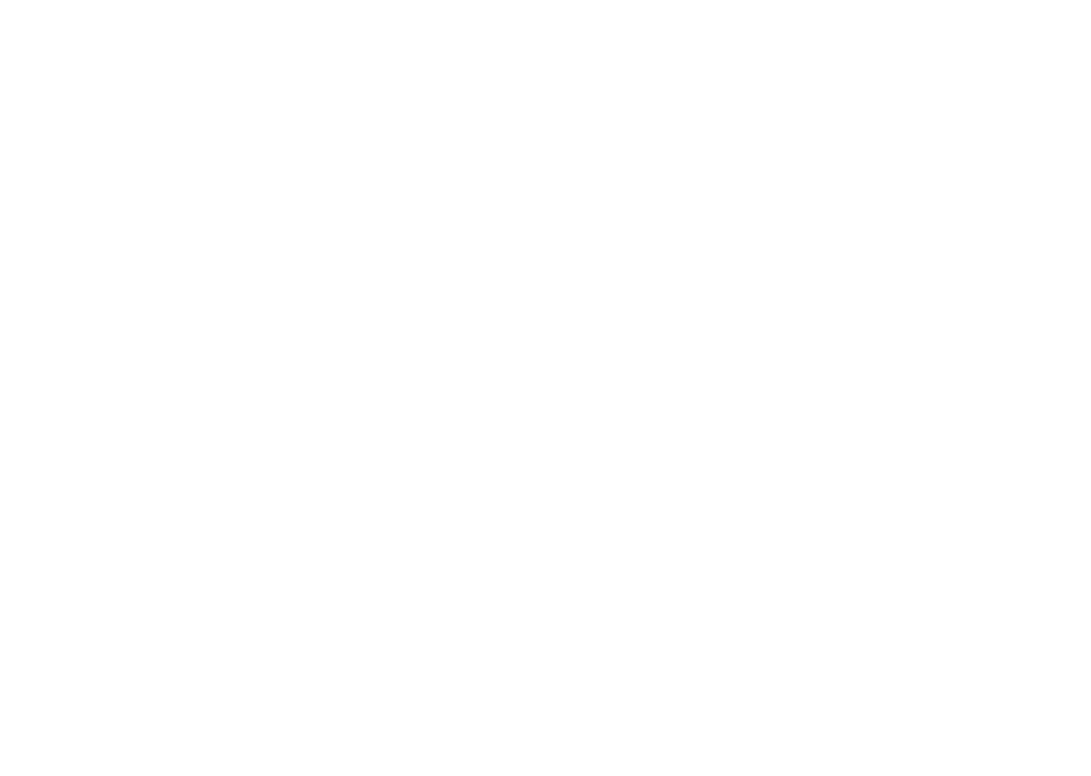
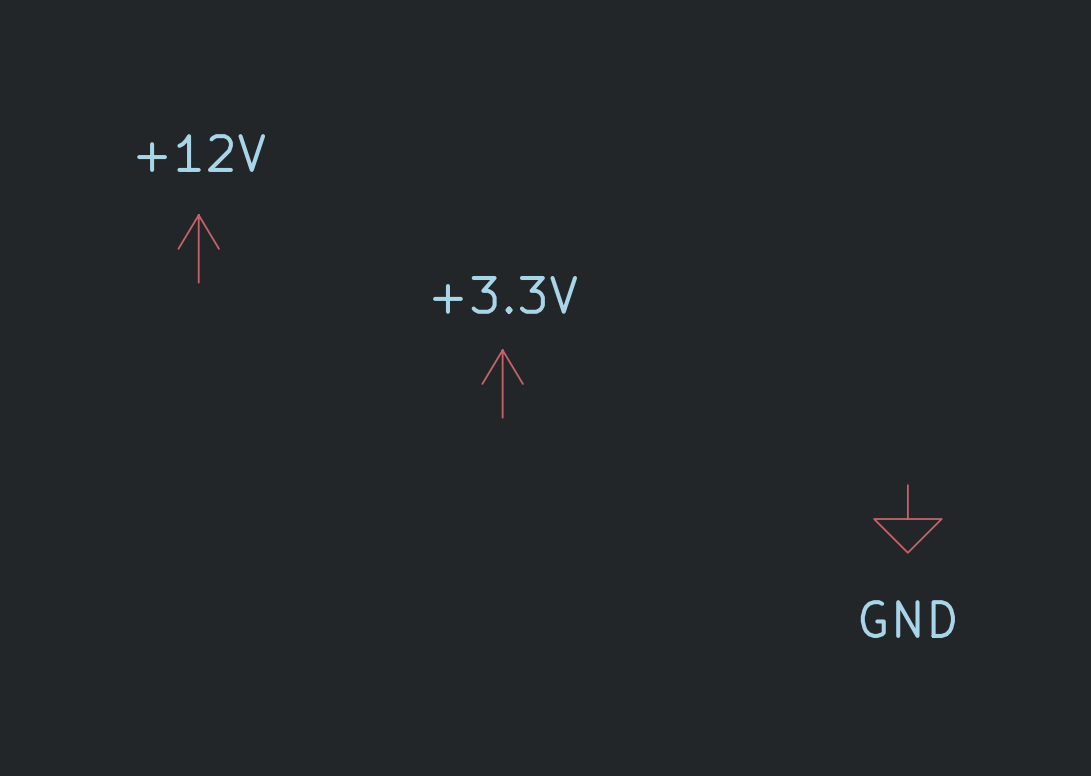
power symbol: none -> +12V (198, 248)
power symbol: none -> +3.3V (502, 383)
power symbol: none -> GND (907, 519)

